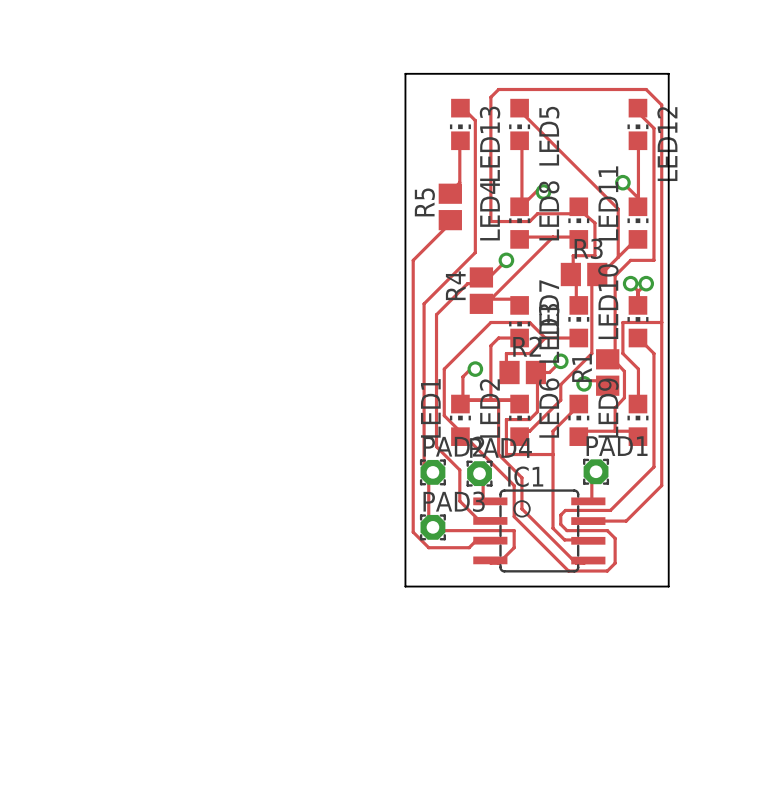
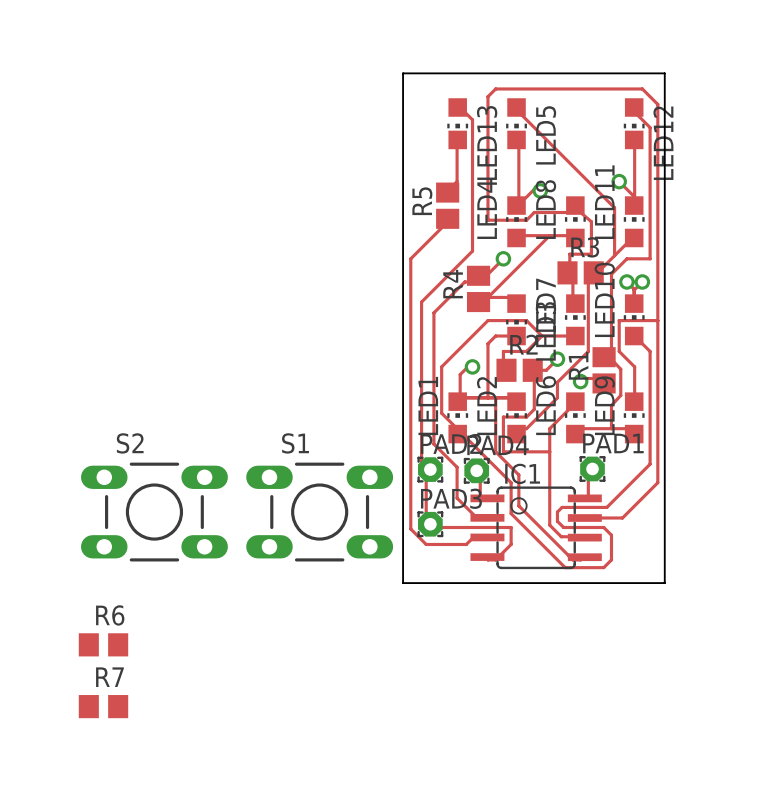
S2: none -> (154, 512)
S1: none -> (319, 512)
R6: none -> (103, 644)
R7: none -> (103, 706)

